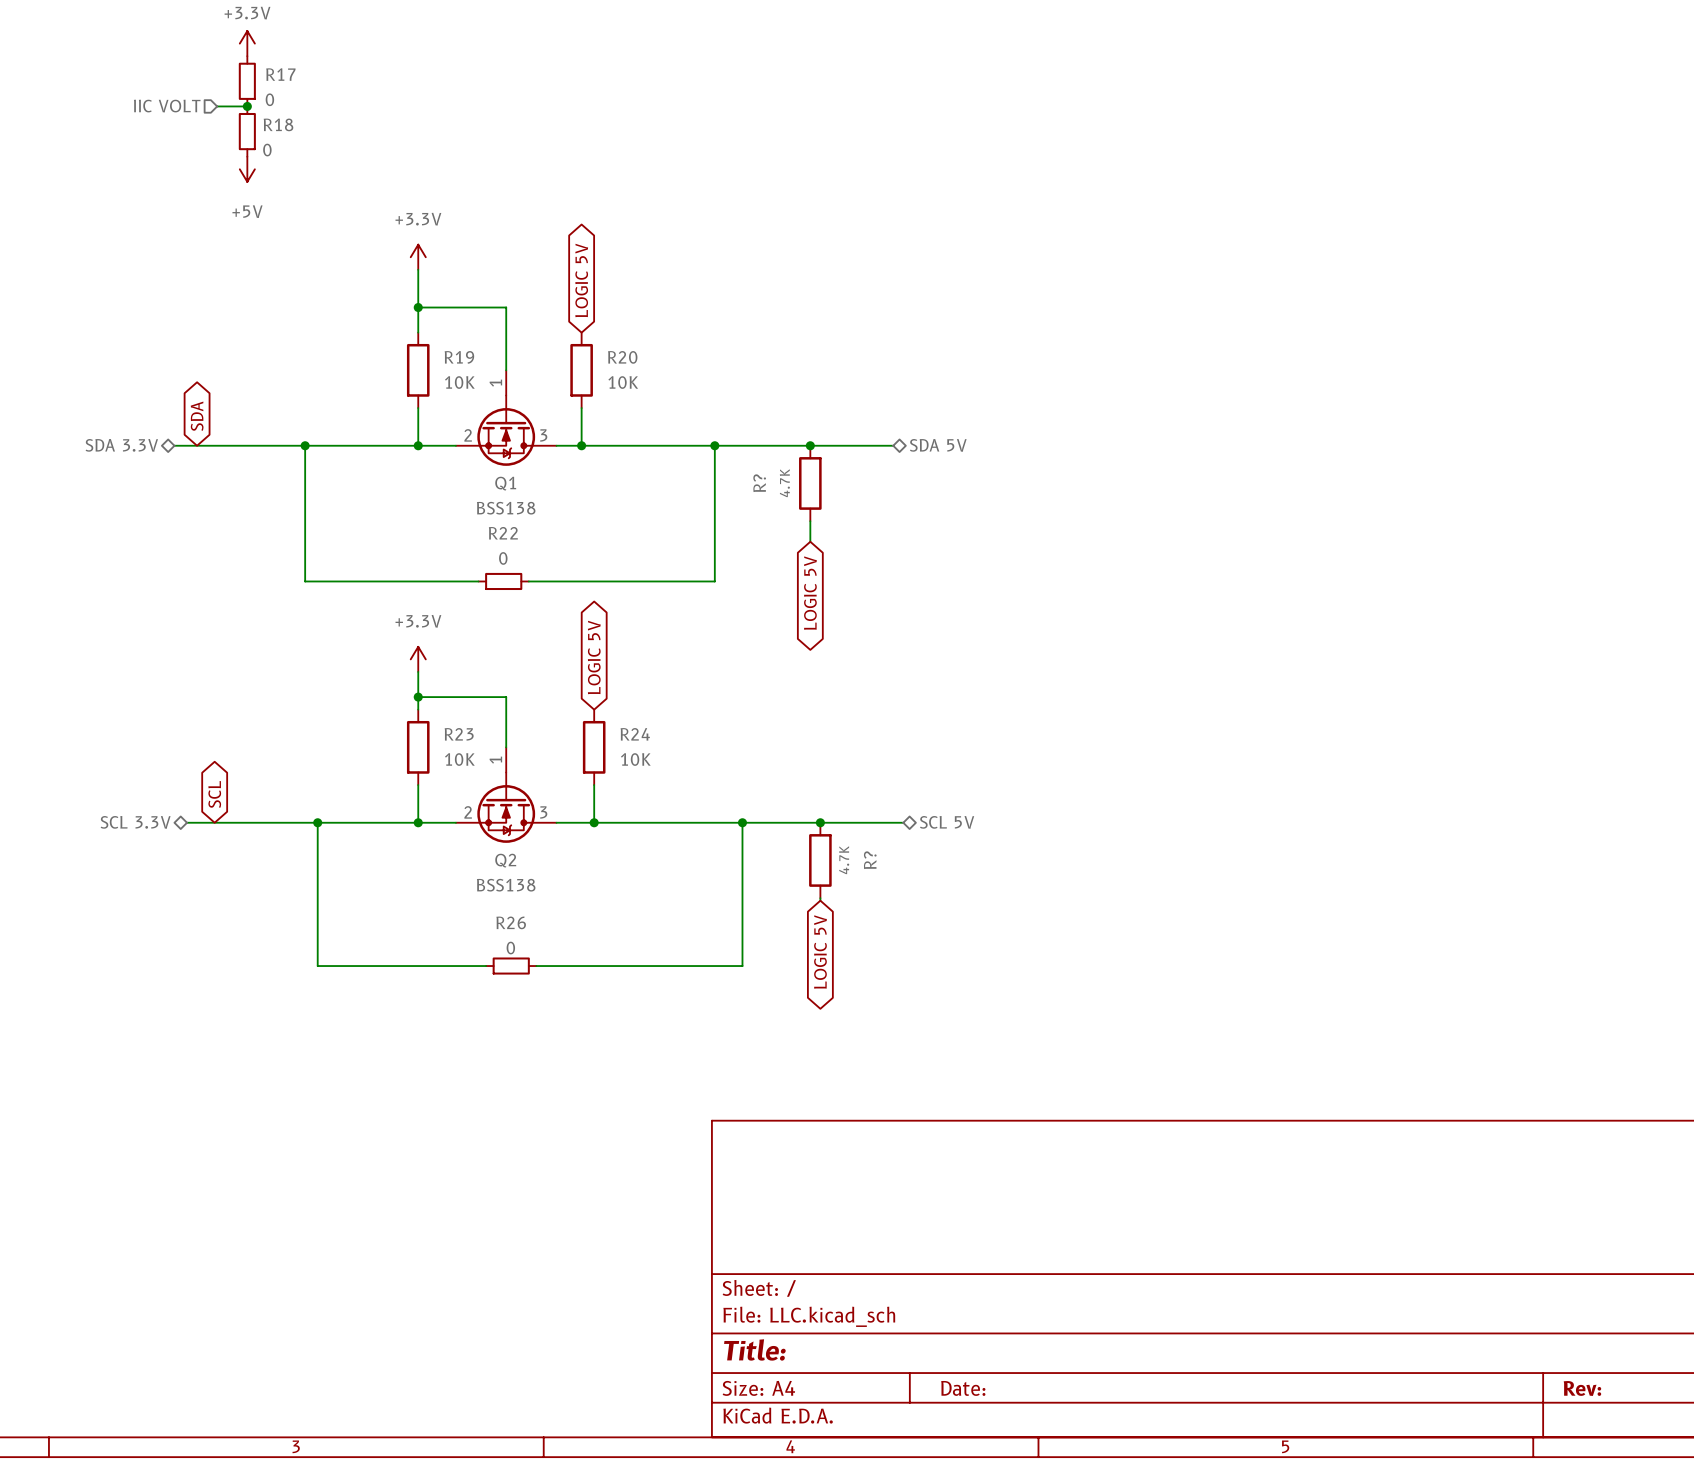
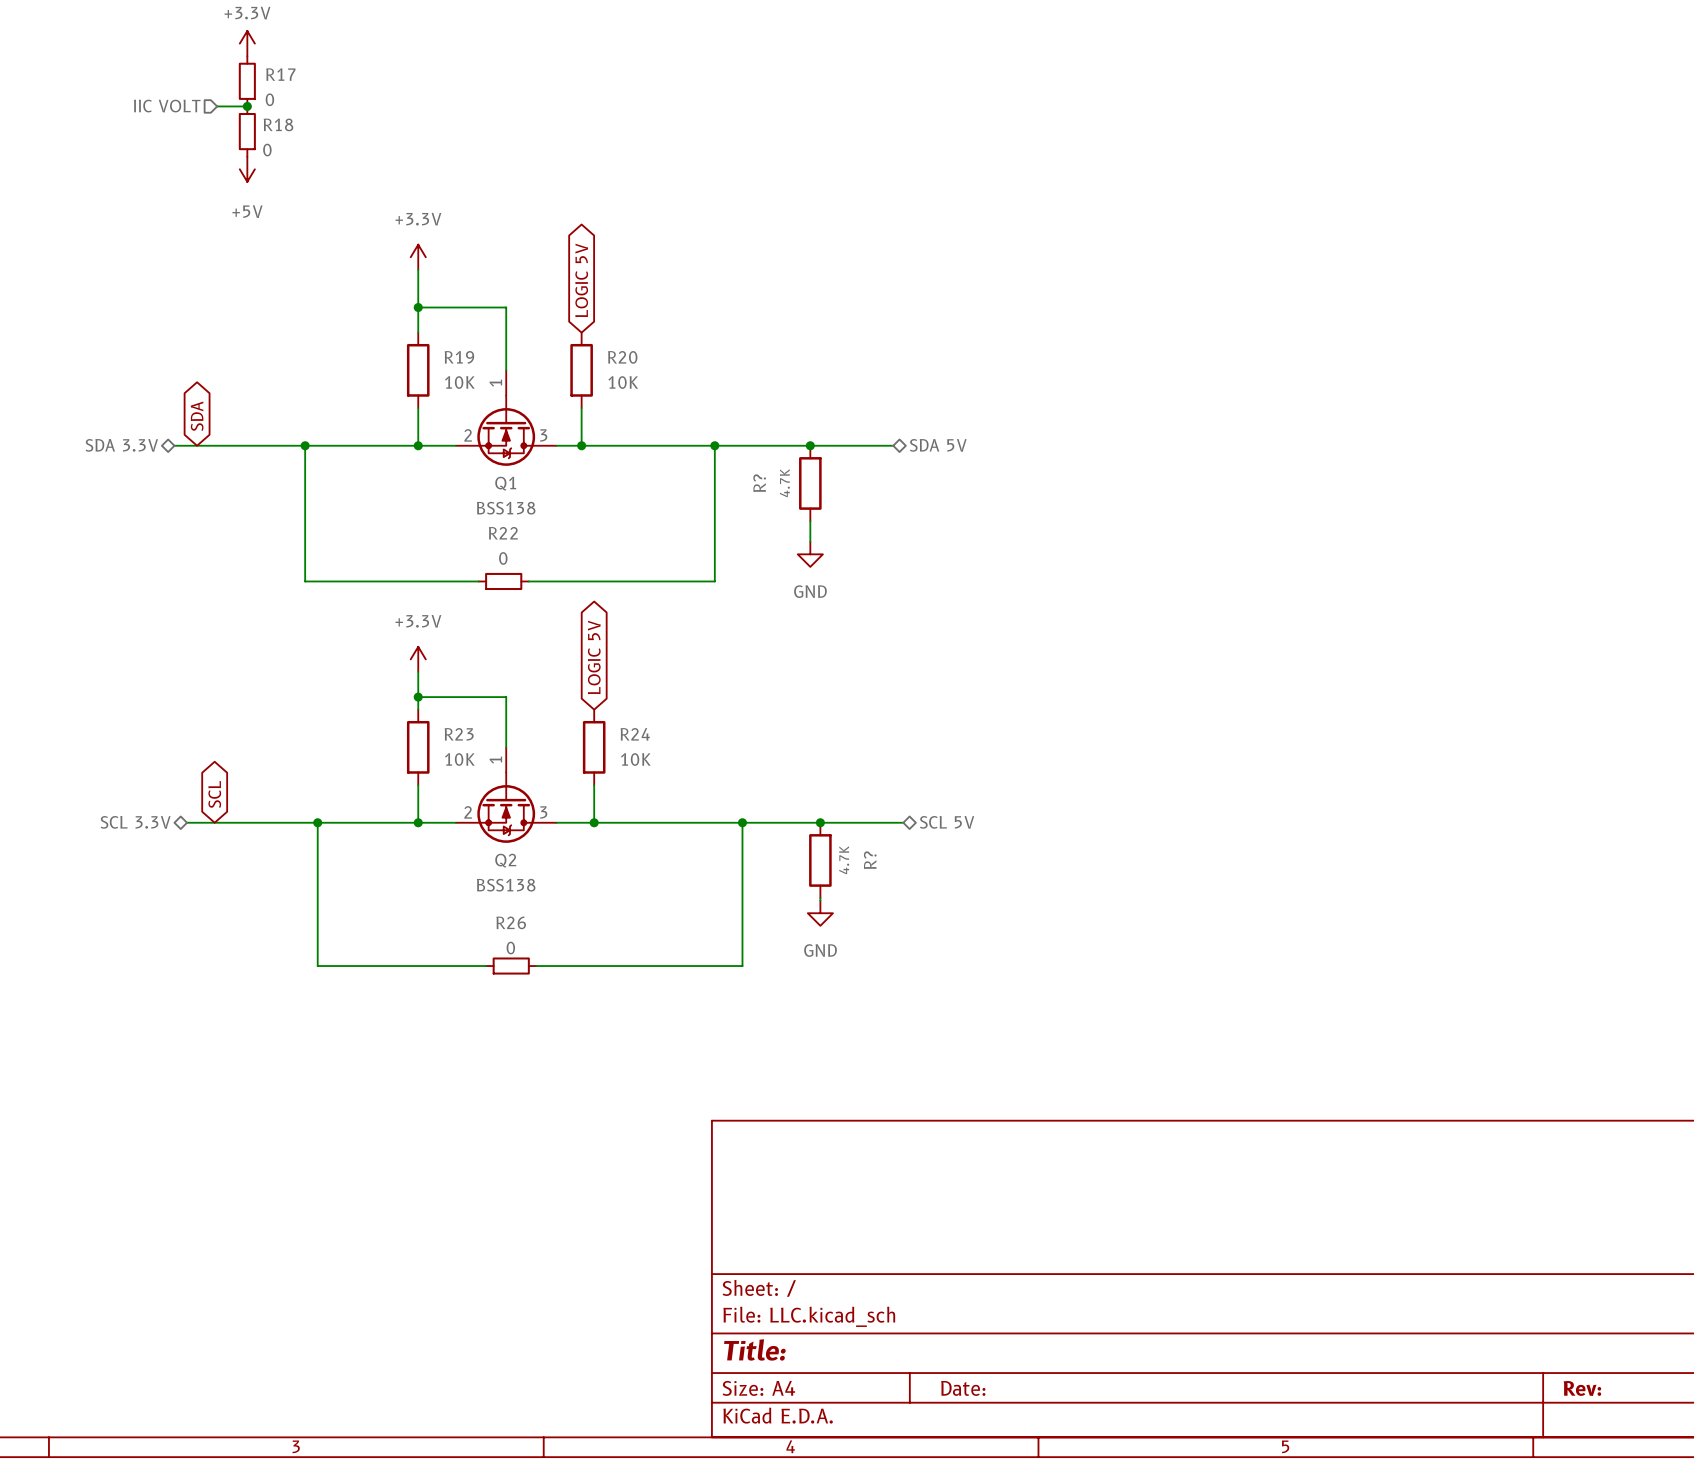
power symbol: none -> GND (810, 554)
global label: LOGIC 5V (810, 593) -> none
power symbol: none -> GND (820, 913)
global label: LOGIC 5V (820, 952) -> none

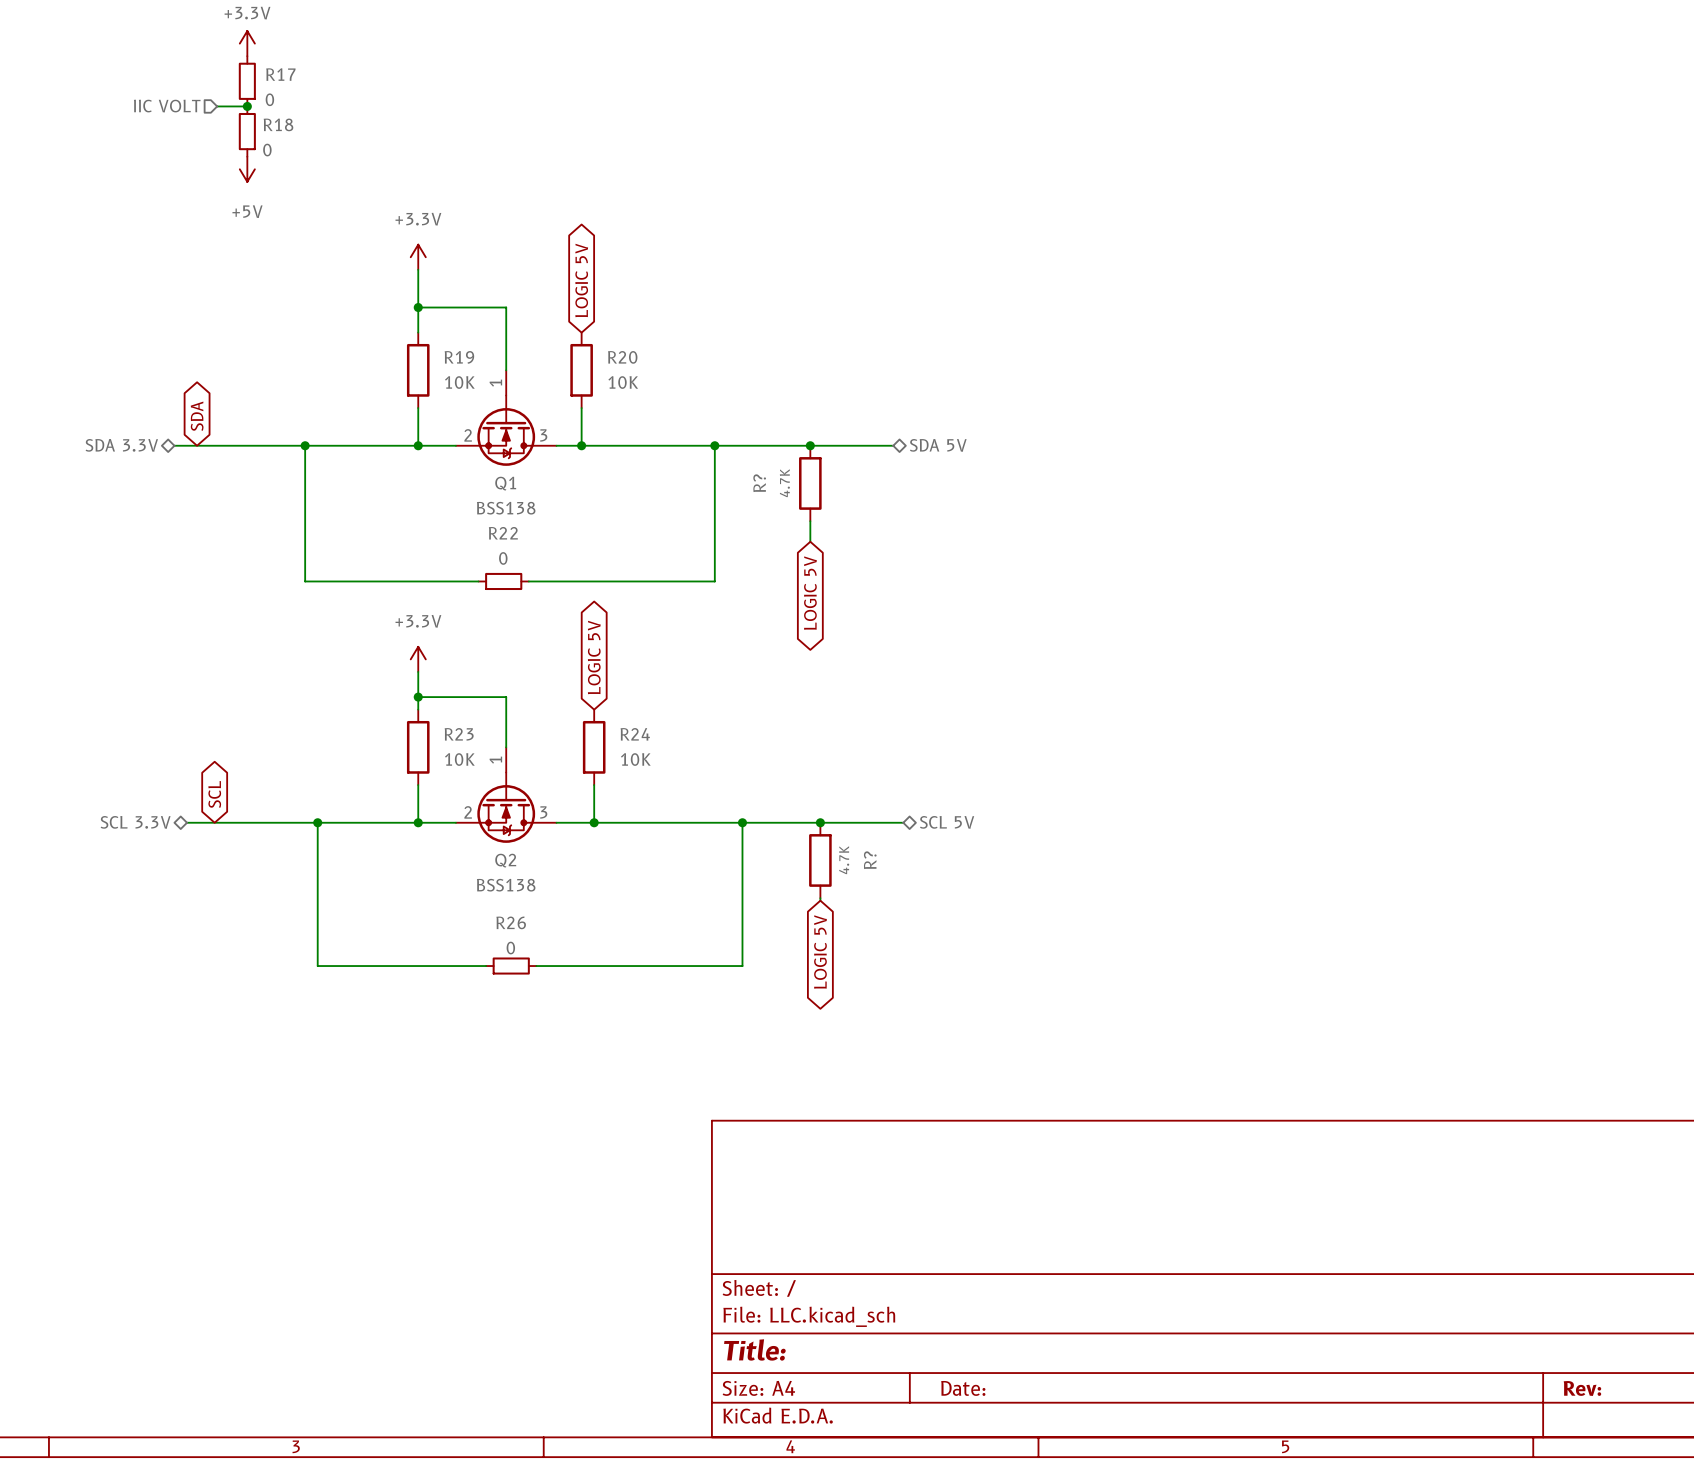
power symbol: GND (810, 554) -> none
global label: none -> LOGIC 5V (810, 593)
power symbol: GND (820, 913) -> none
global label: none -> LOGIC 5V (820, 952)

